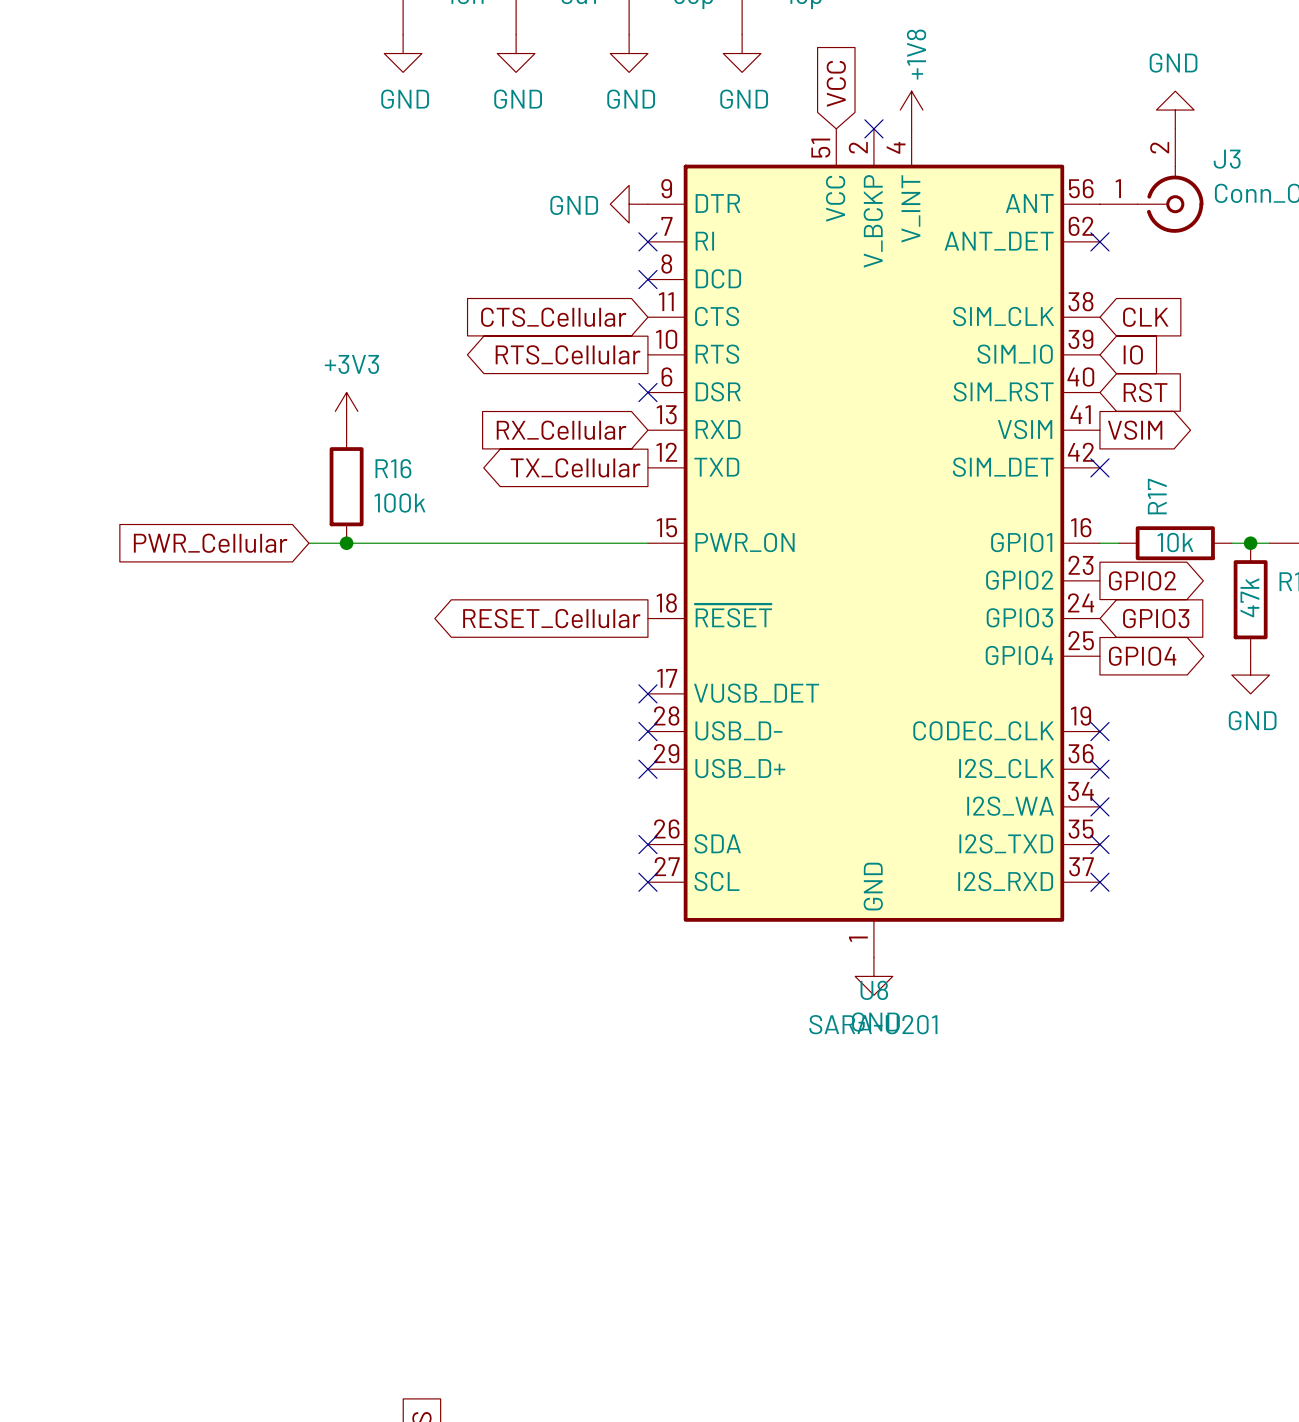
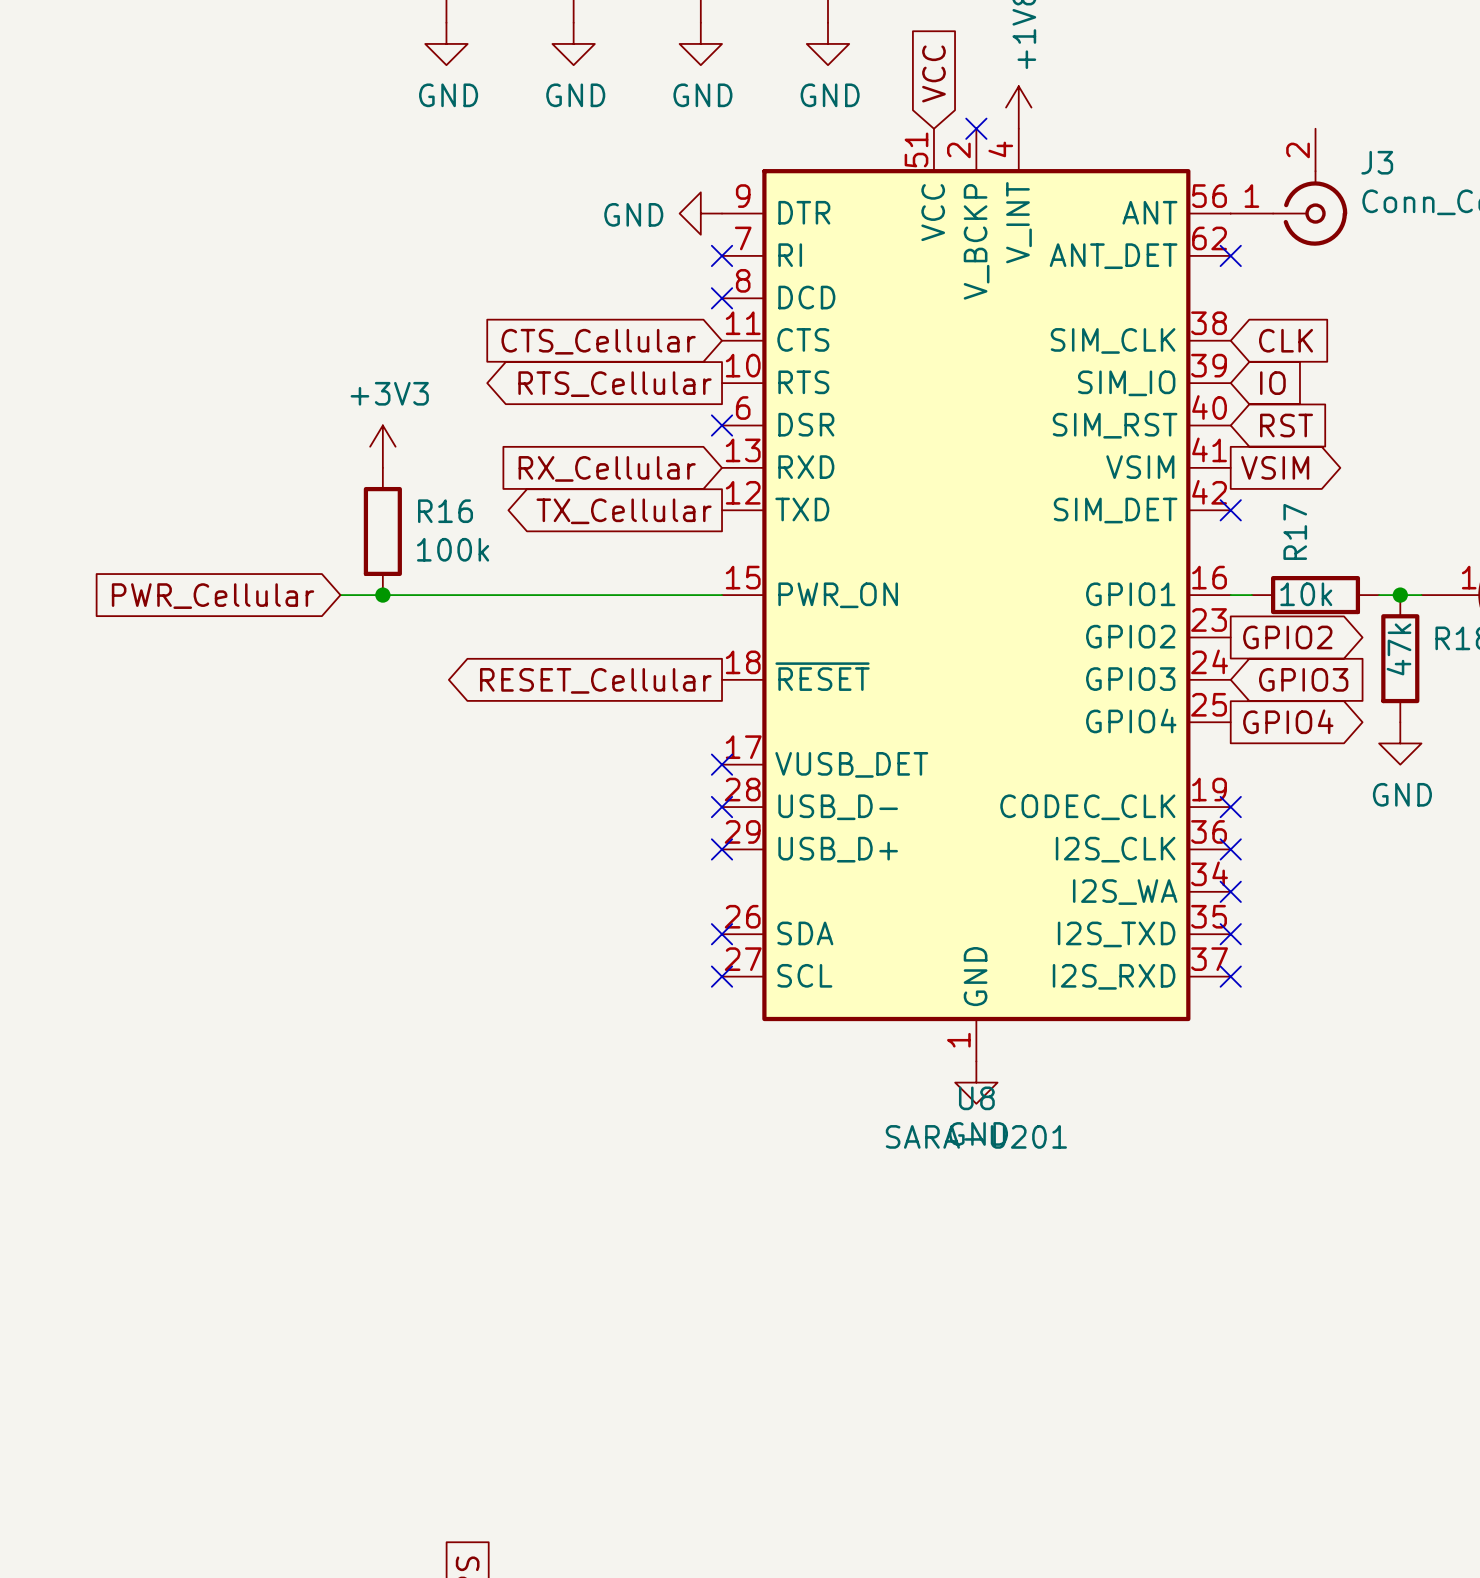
power symbol: GND (1175, 110) -> none

